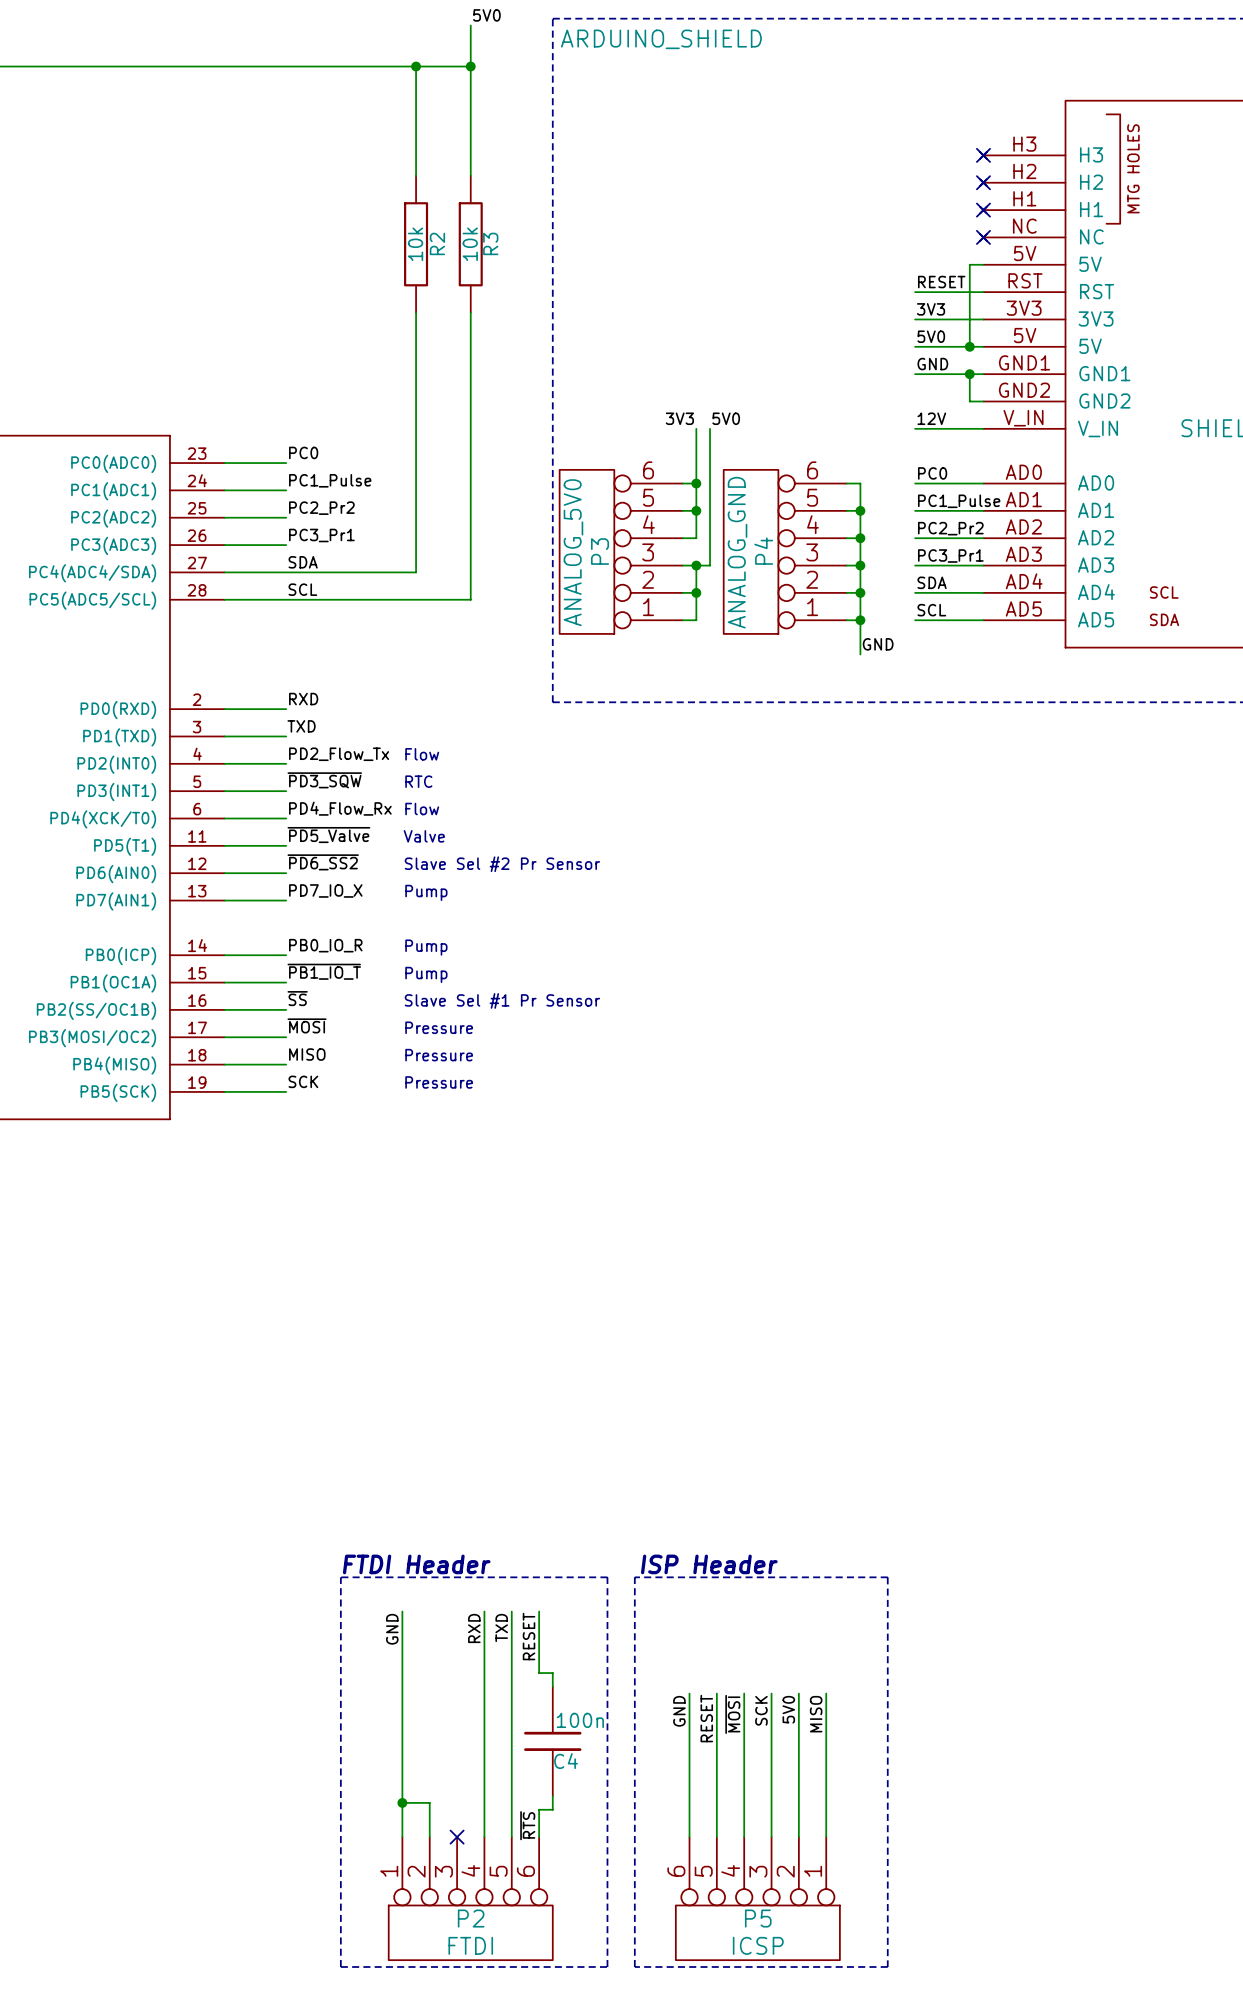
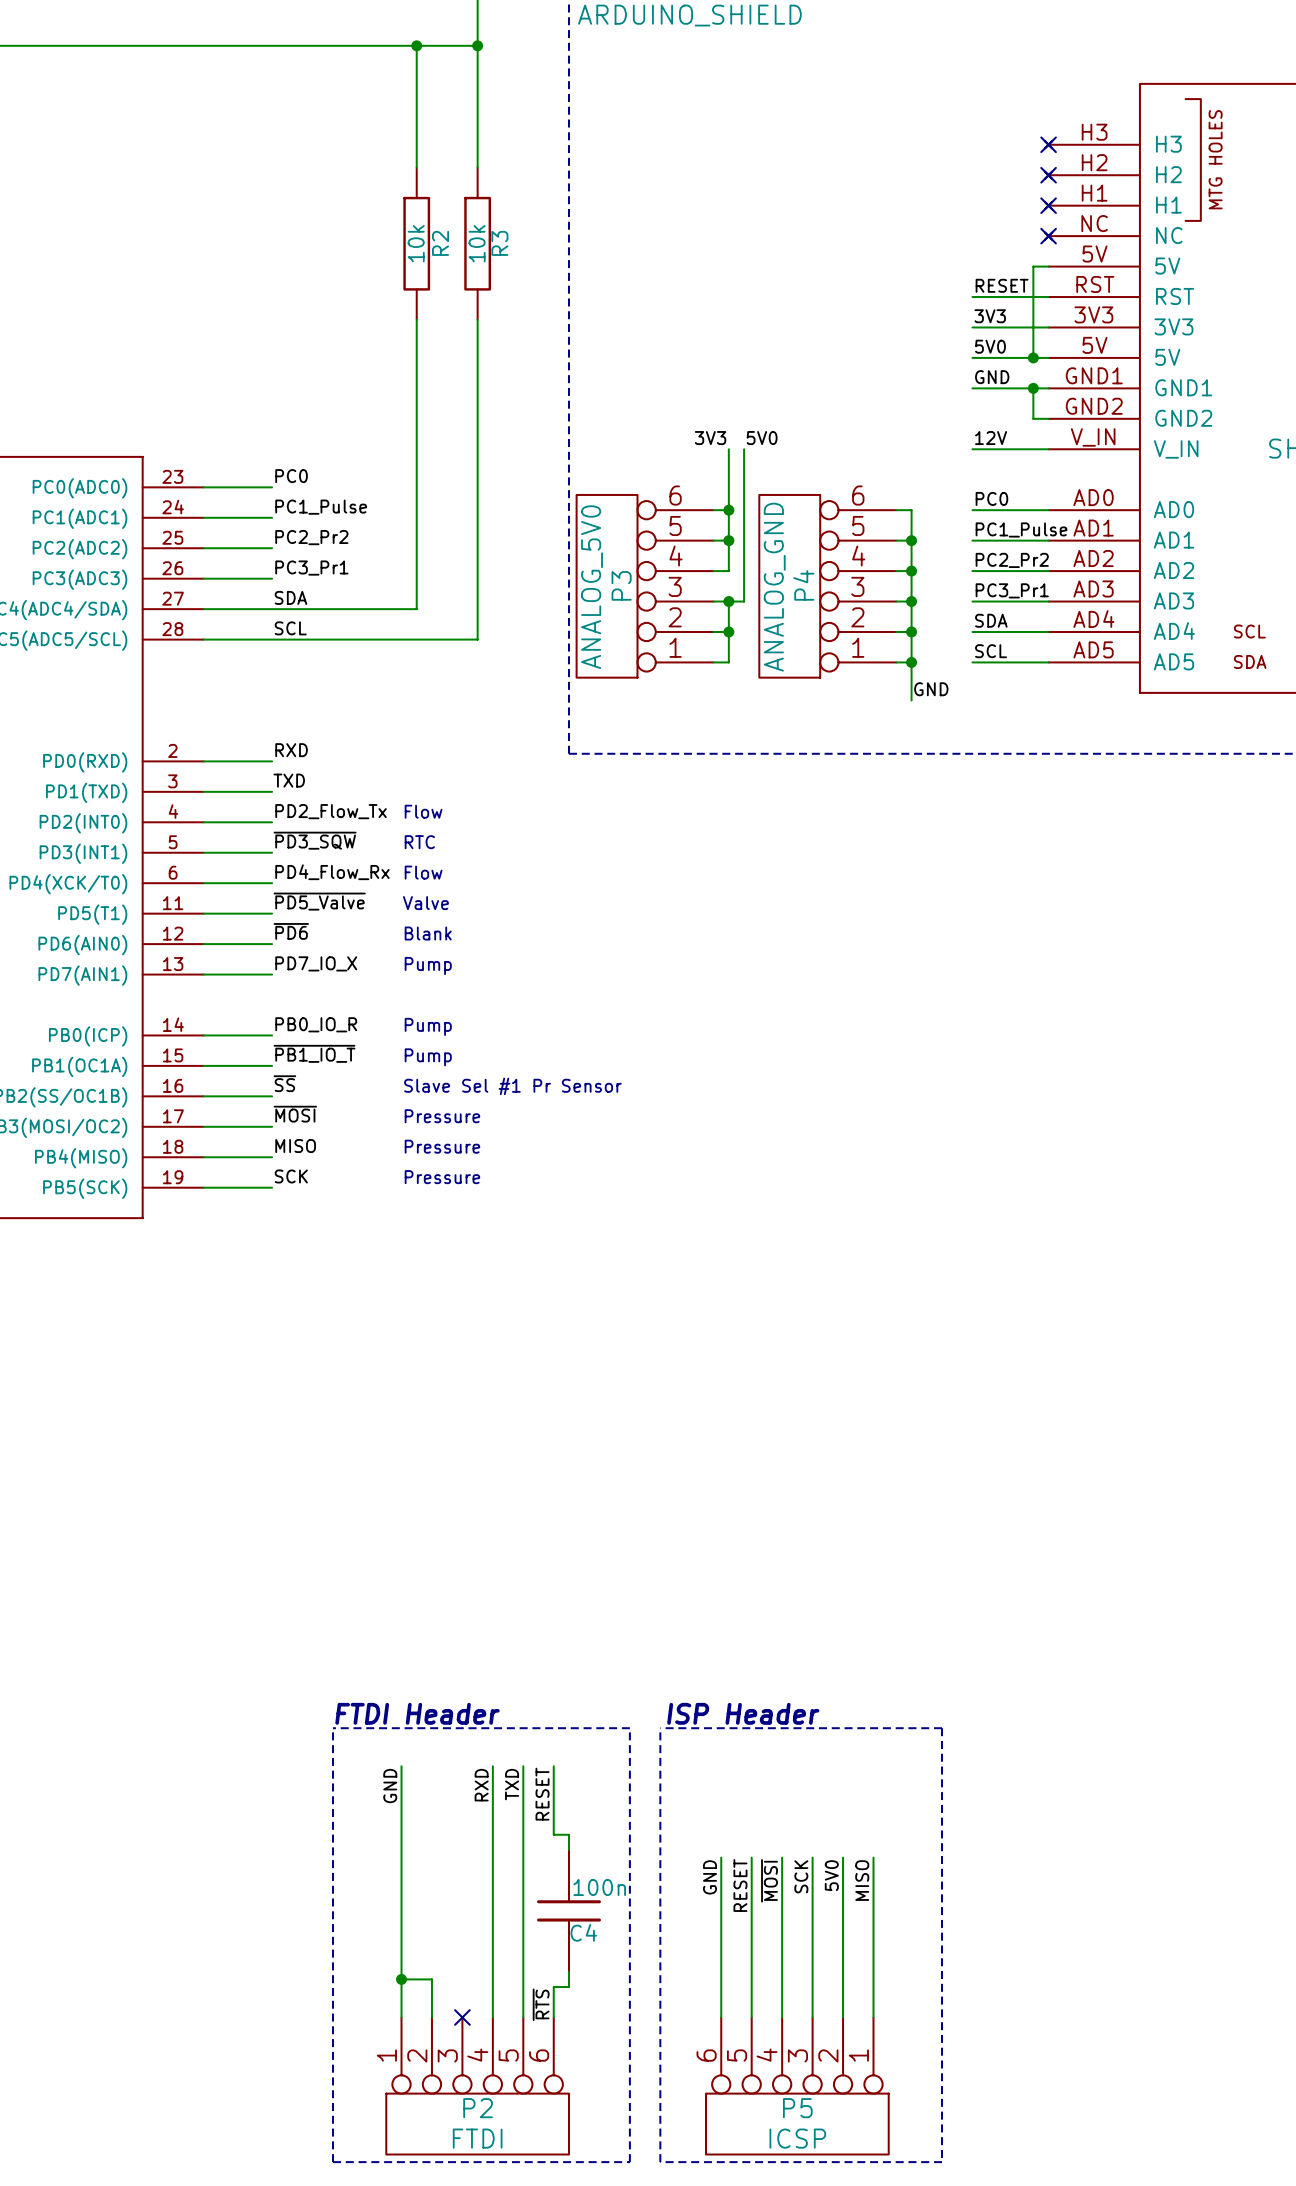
label: ~{PD6_SS2} (323, 862) -> ~{PD6} (291, 931)
text: Slave Sel #2 Pr Sensor (502, 864) -> Blank (428, 933)

